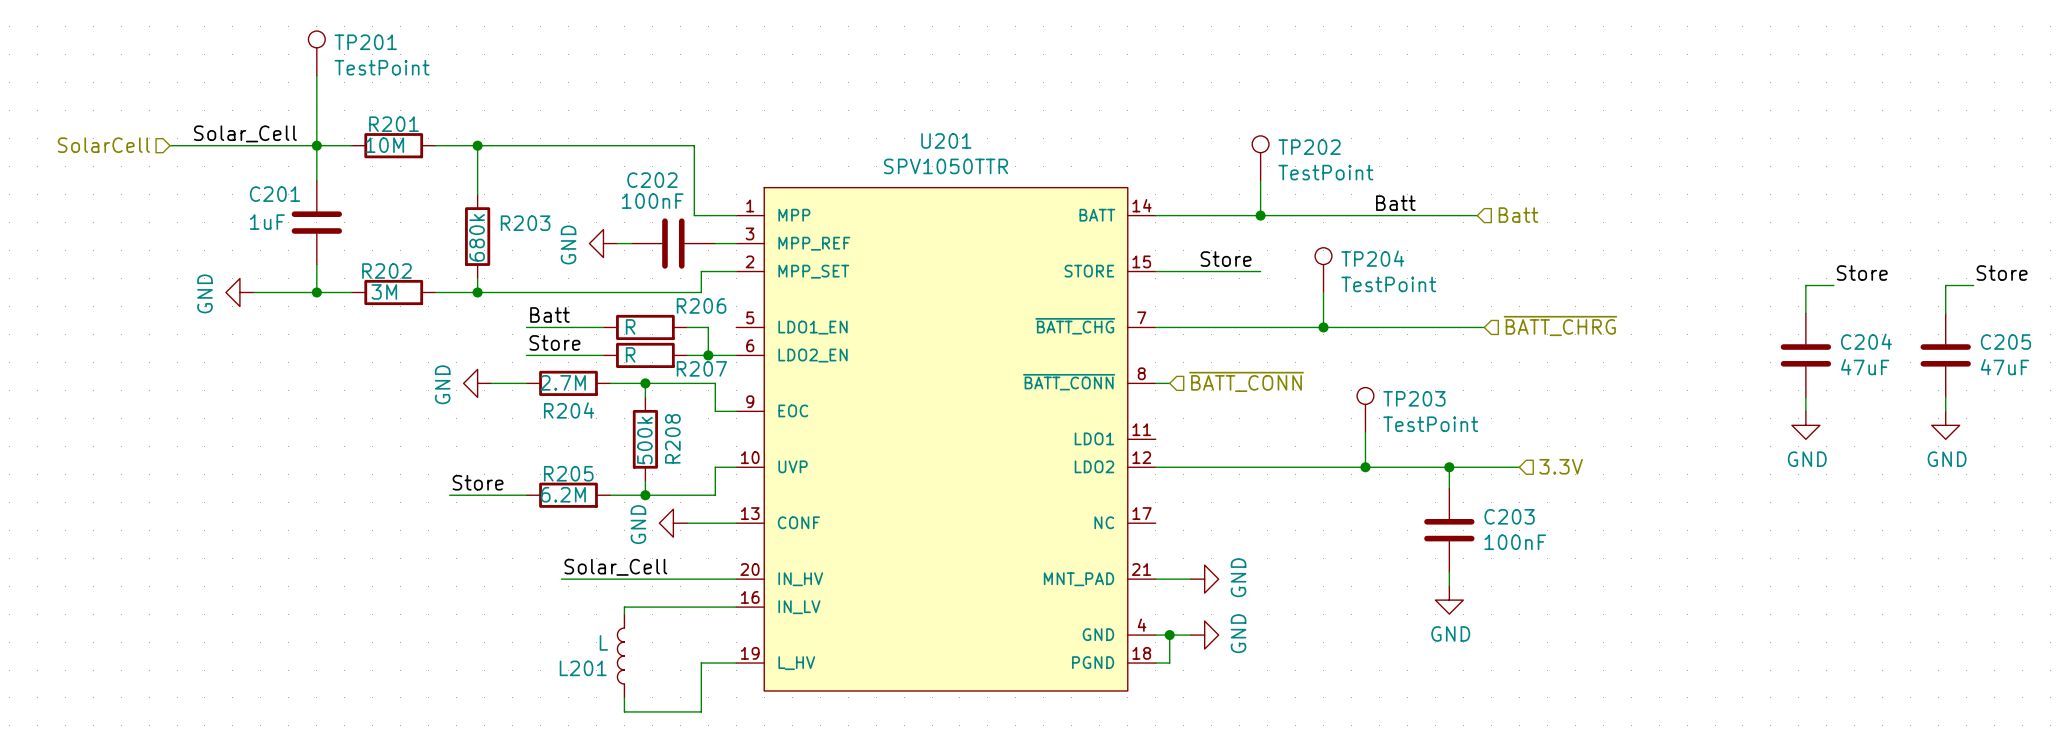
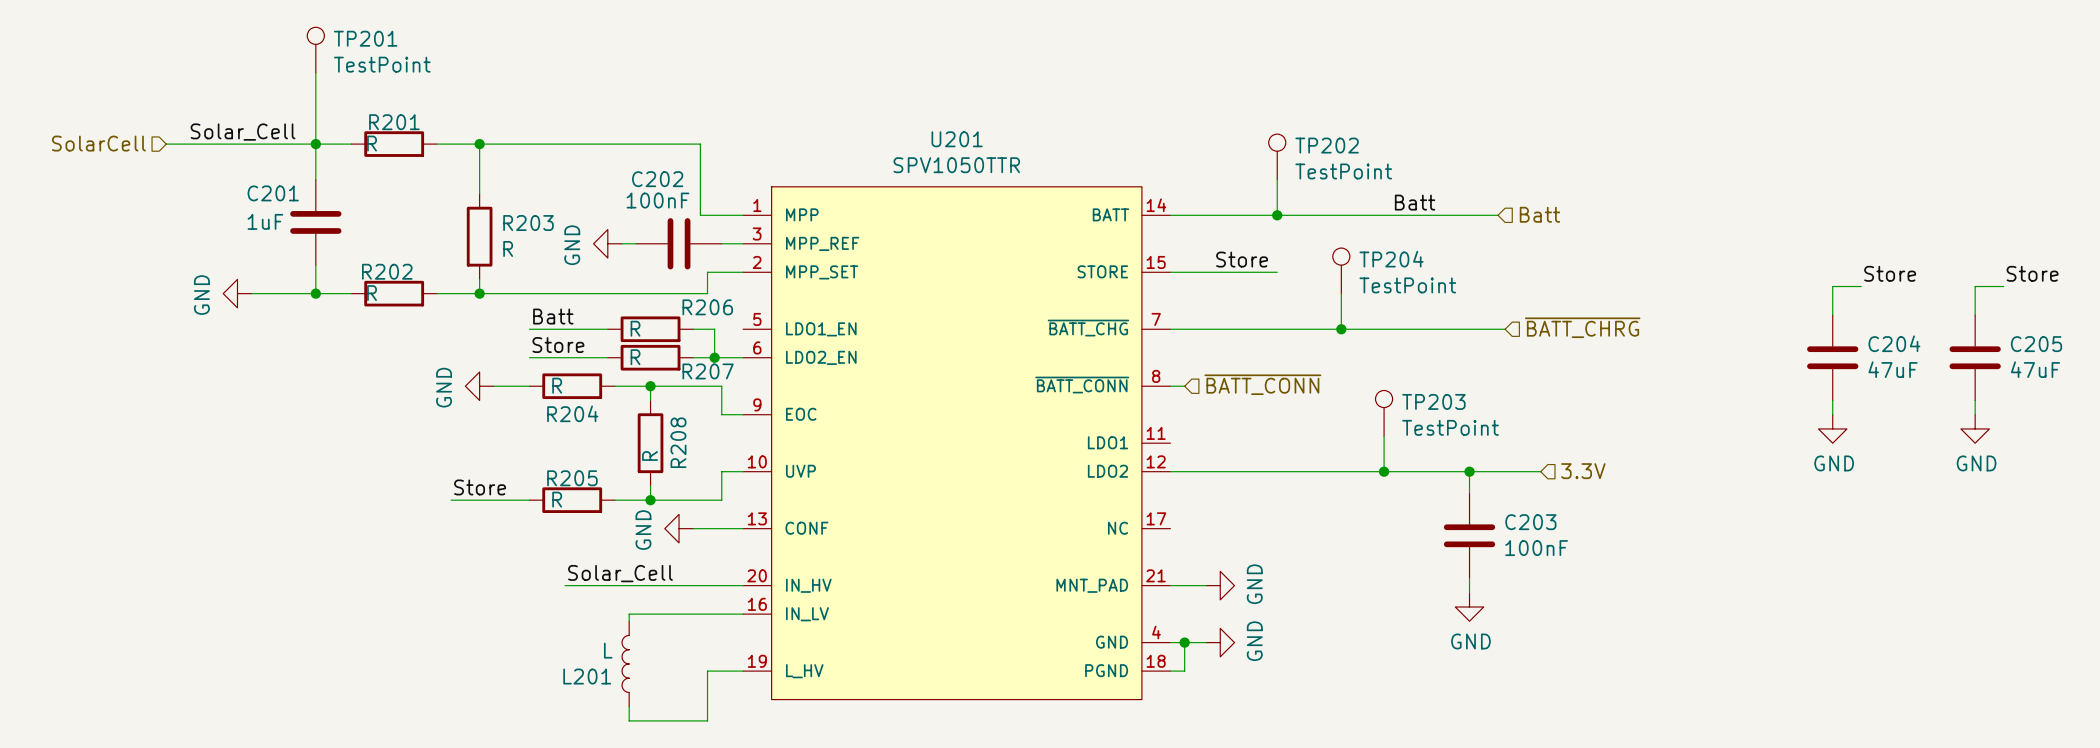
R201 value: 10M (384, 145) -> R (372, 143)
R203 value: 680k (477, 237) -> R (508, 248)
R202 value: 3M (384, 291) -> R (372, 293)
R204 value: 2.7M (563, 382) -> R (557, 385)
R208 value: 500k (644, 440) -> R (650, 455)
R205 value: 6.2M (563, 494) -> R (557, 499)

